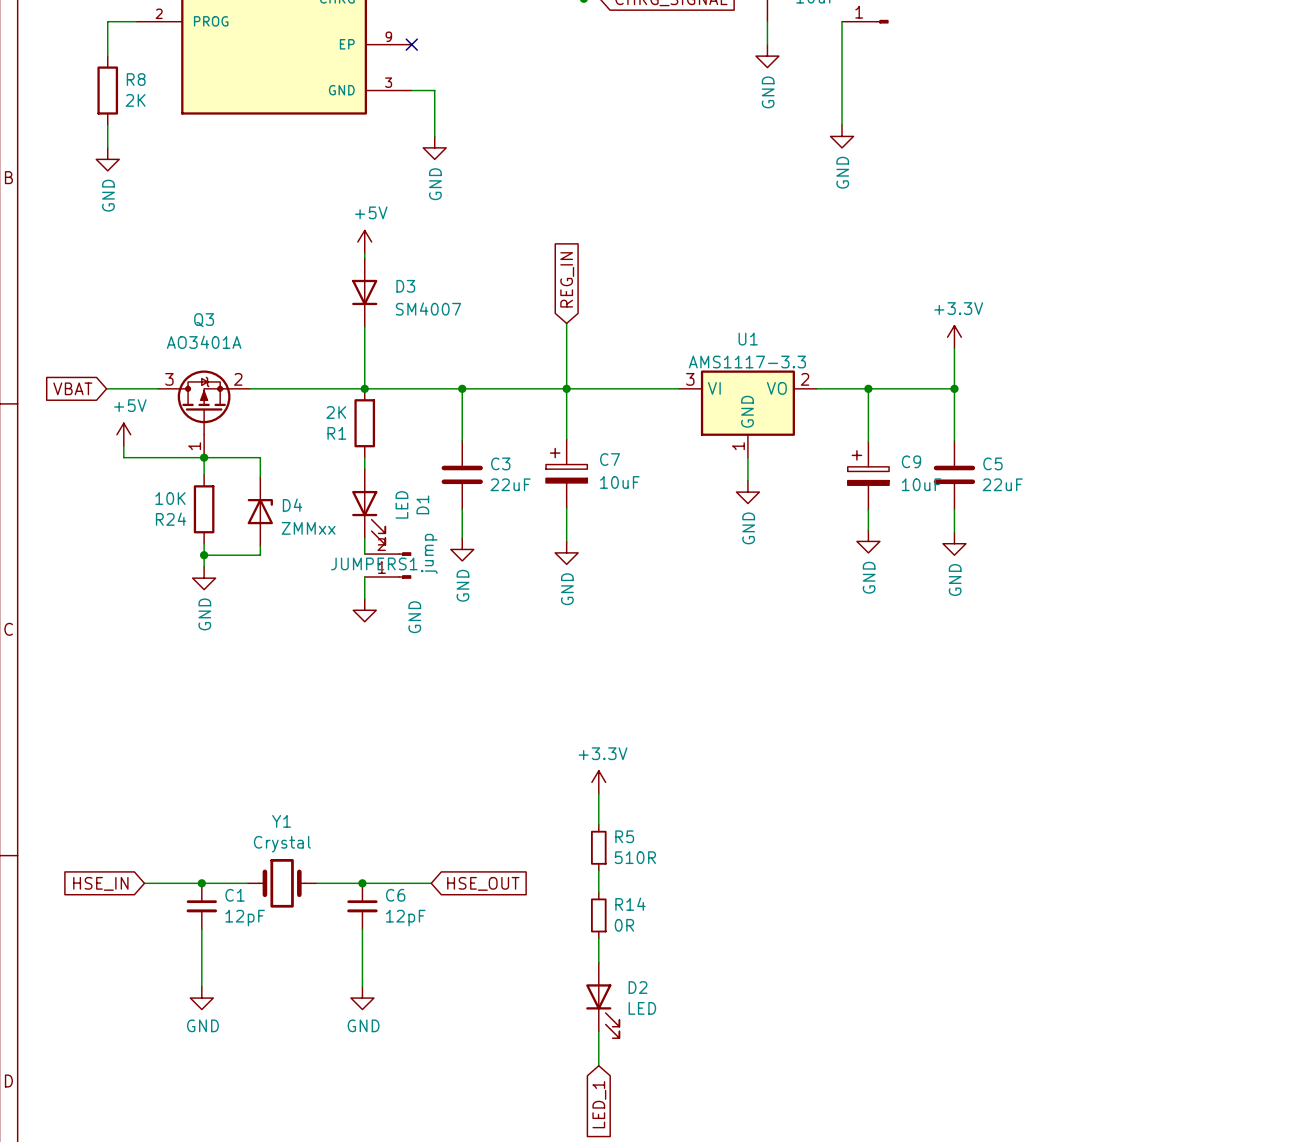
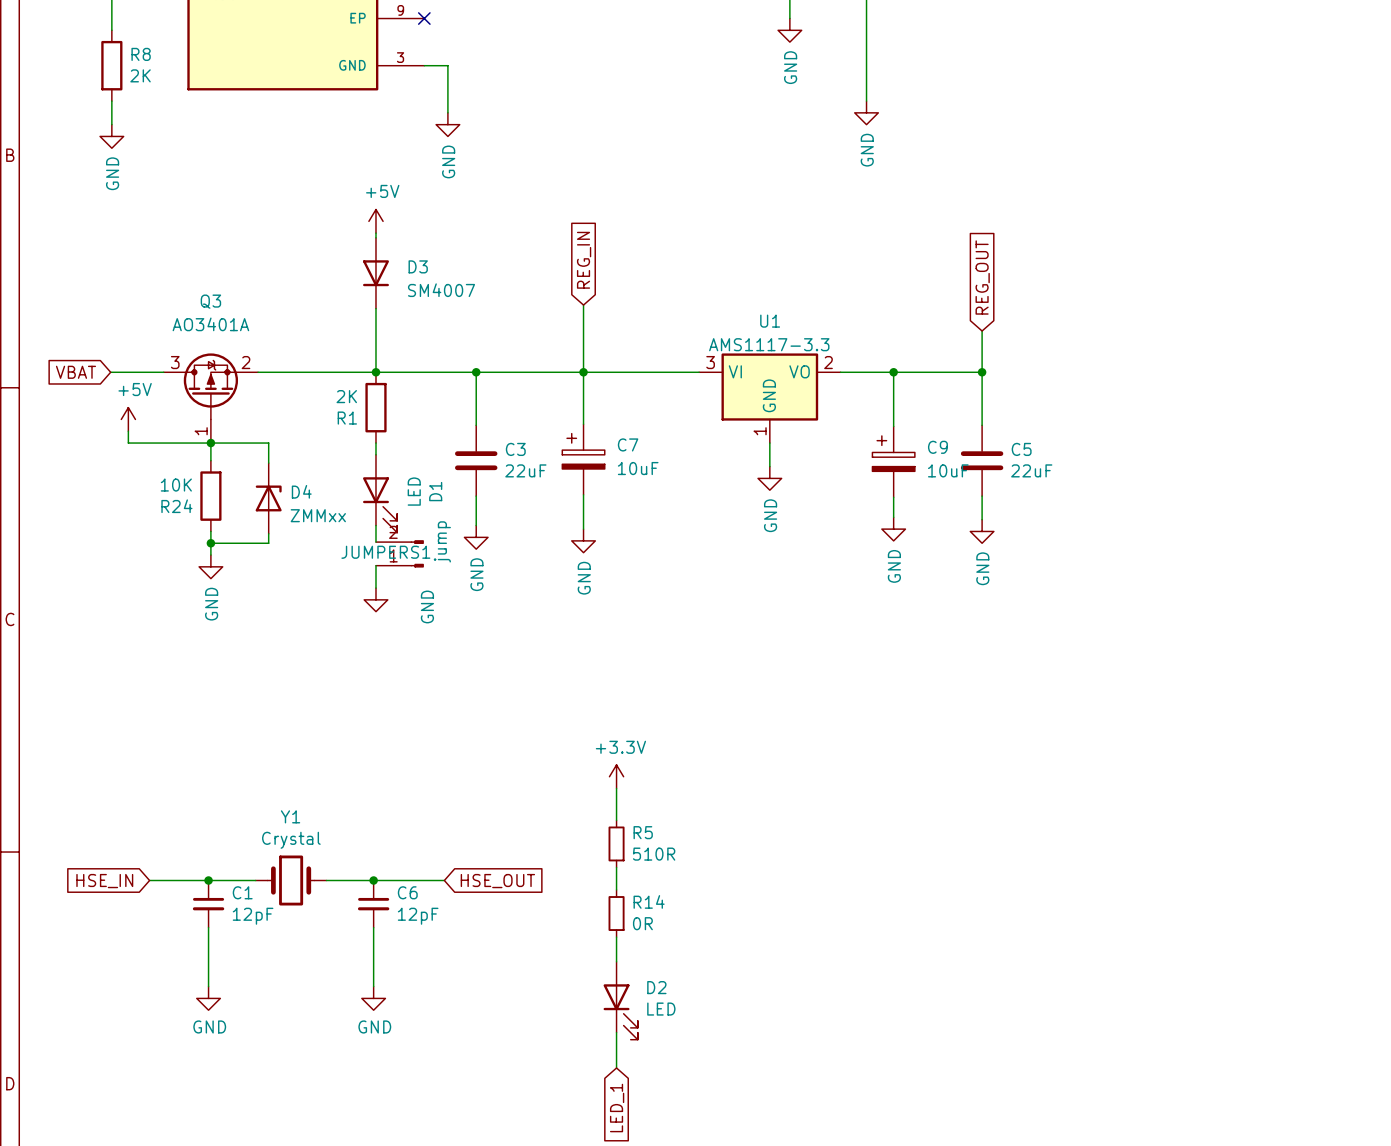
global label: none -> REG_OUT (982, 277)
power symbol: +3.3V (954, 337) -> none

